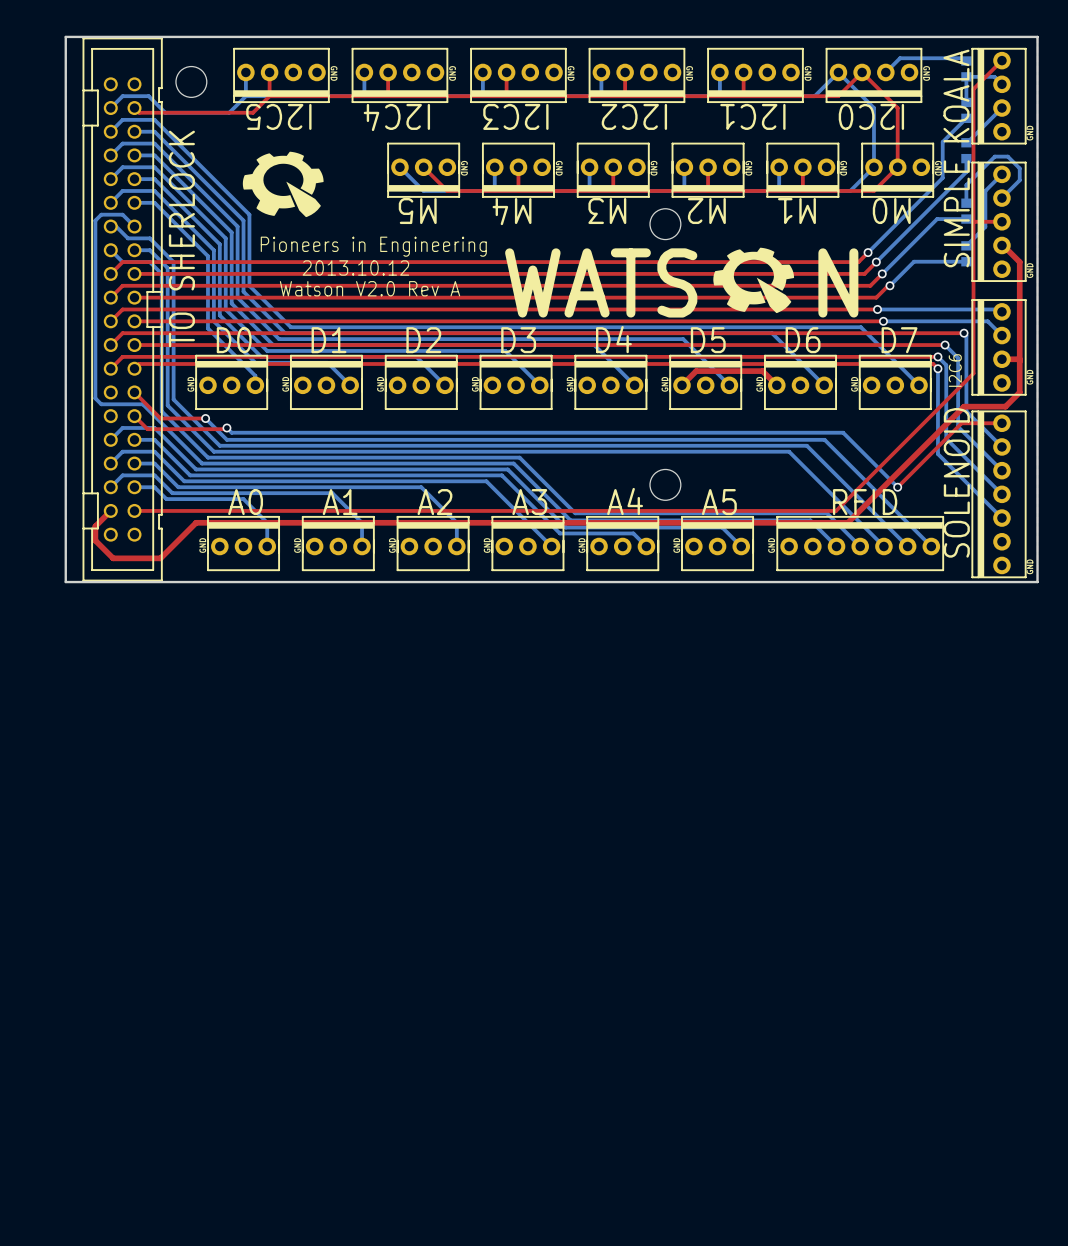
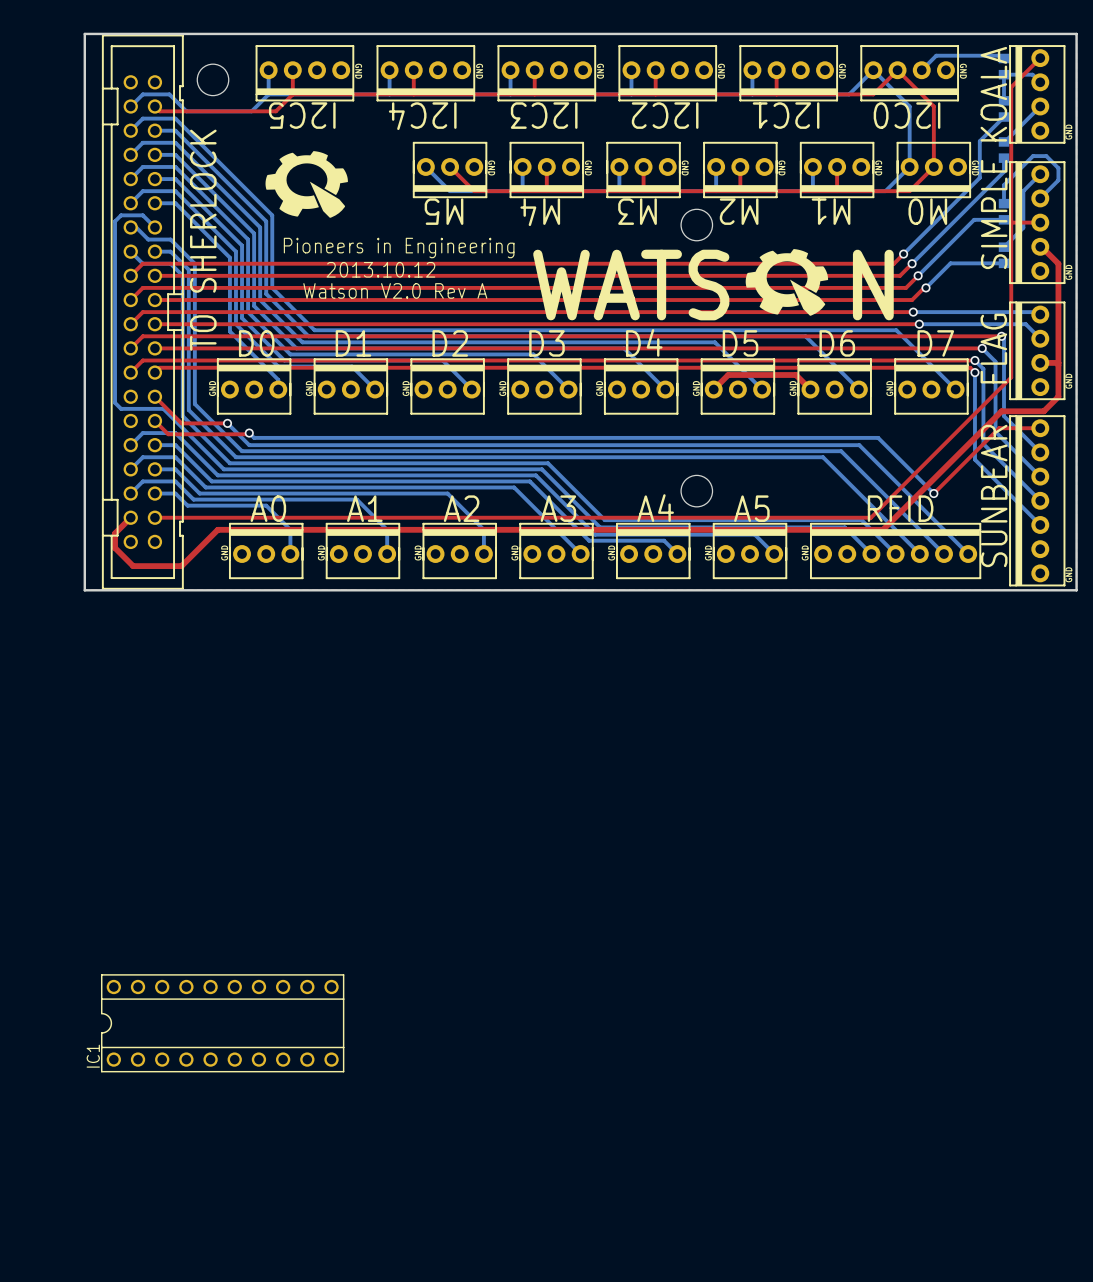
I2C6 name: I2C6 (955, 370) -> FLAG (993, 348)
SOLENOID name: SOLENOID (956, 482) -> SUNBEAR (994, 495)
IC1: none -> (222, 1023)

